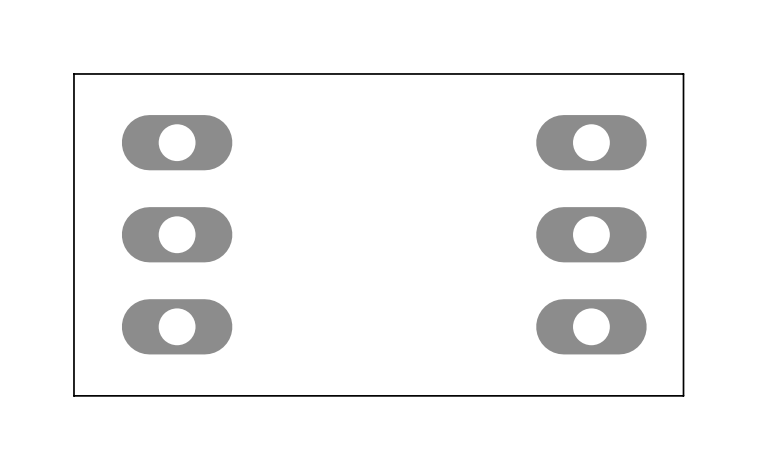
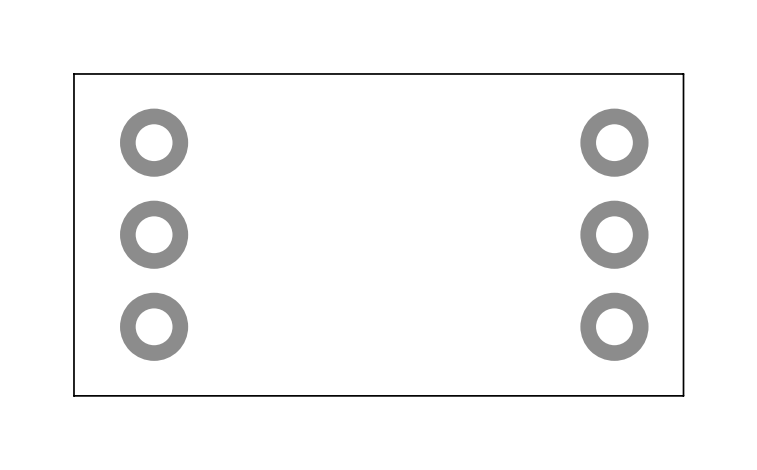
part footprint: [121, 115, 233, 355] -> [120, 108, 189, 361]
part footprint: [536, 115, 647, 355] -> [580, 108, 649, 361]

